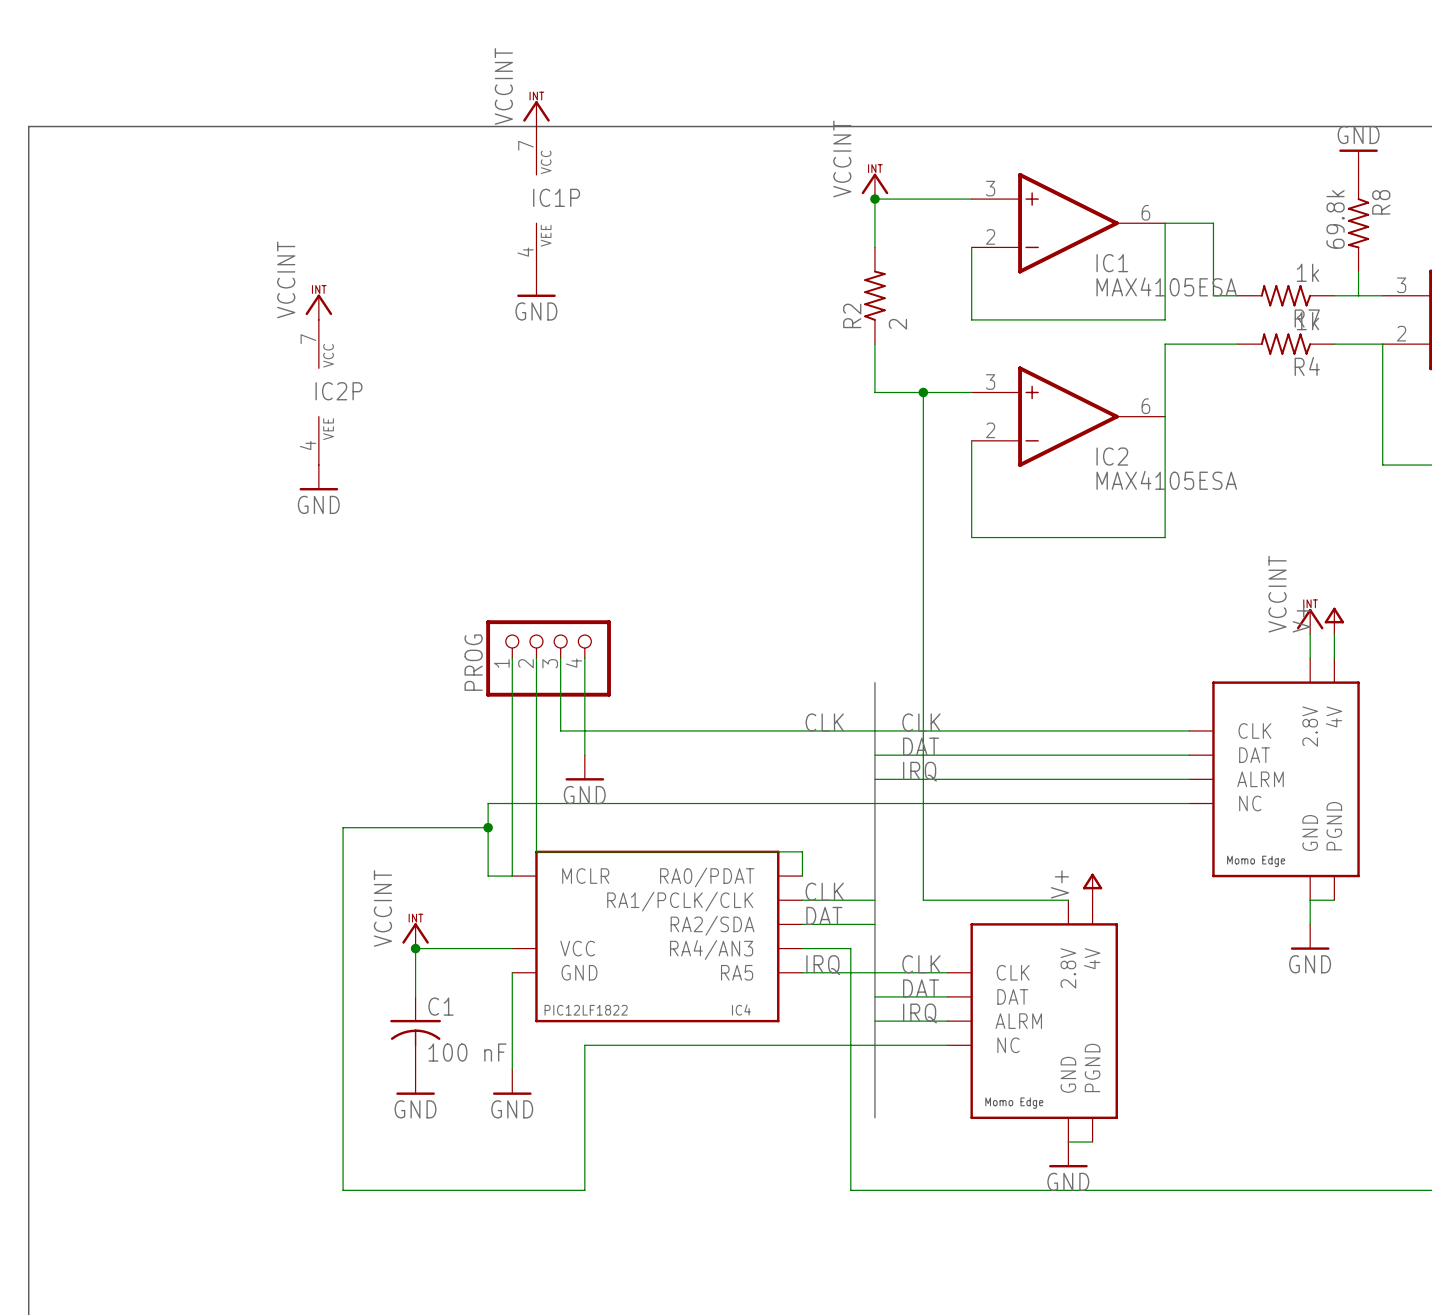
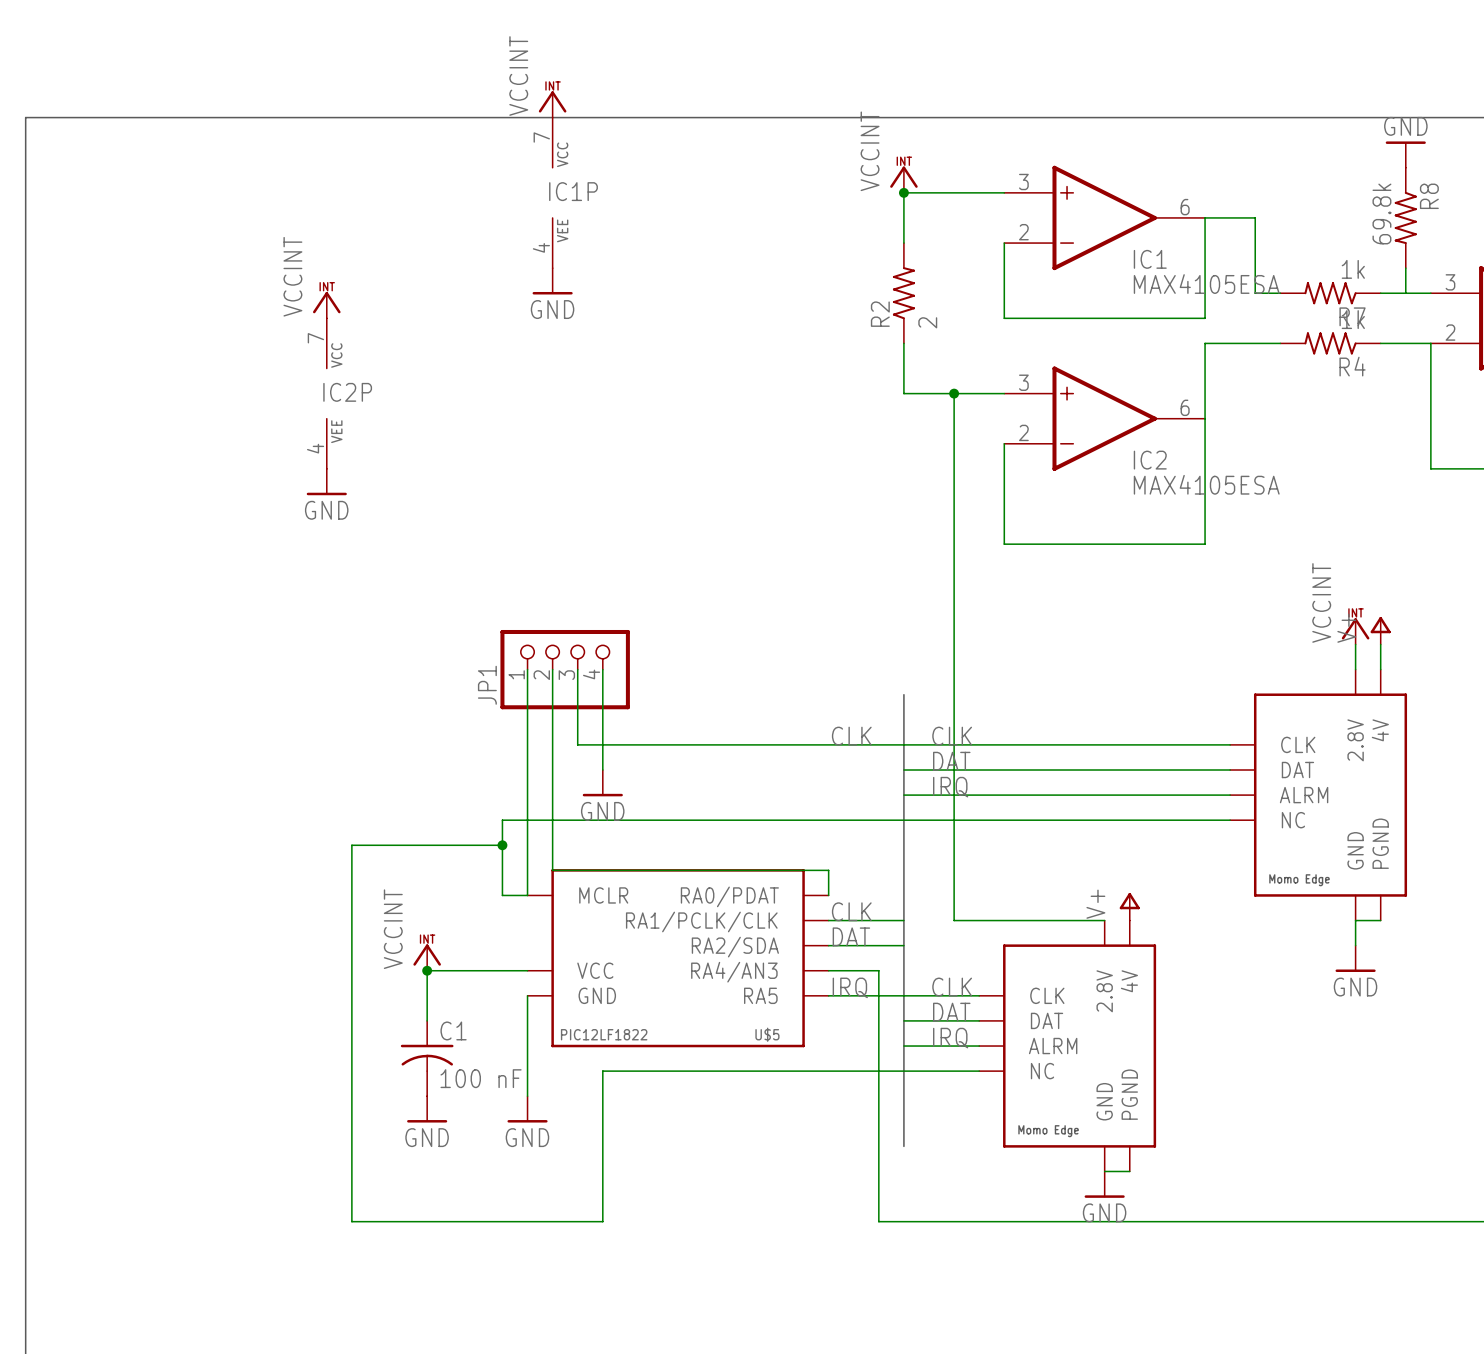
PROG name: PROG (473, 662) -> JP1 (487, 685)
IC4 name: IC4 (741, 1010) -> U$5 (767, 1034)

